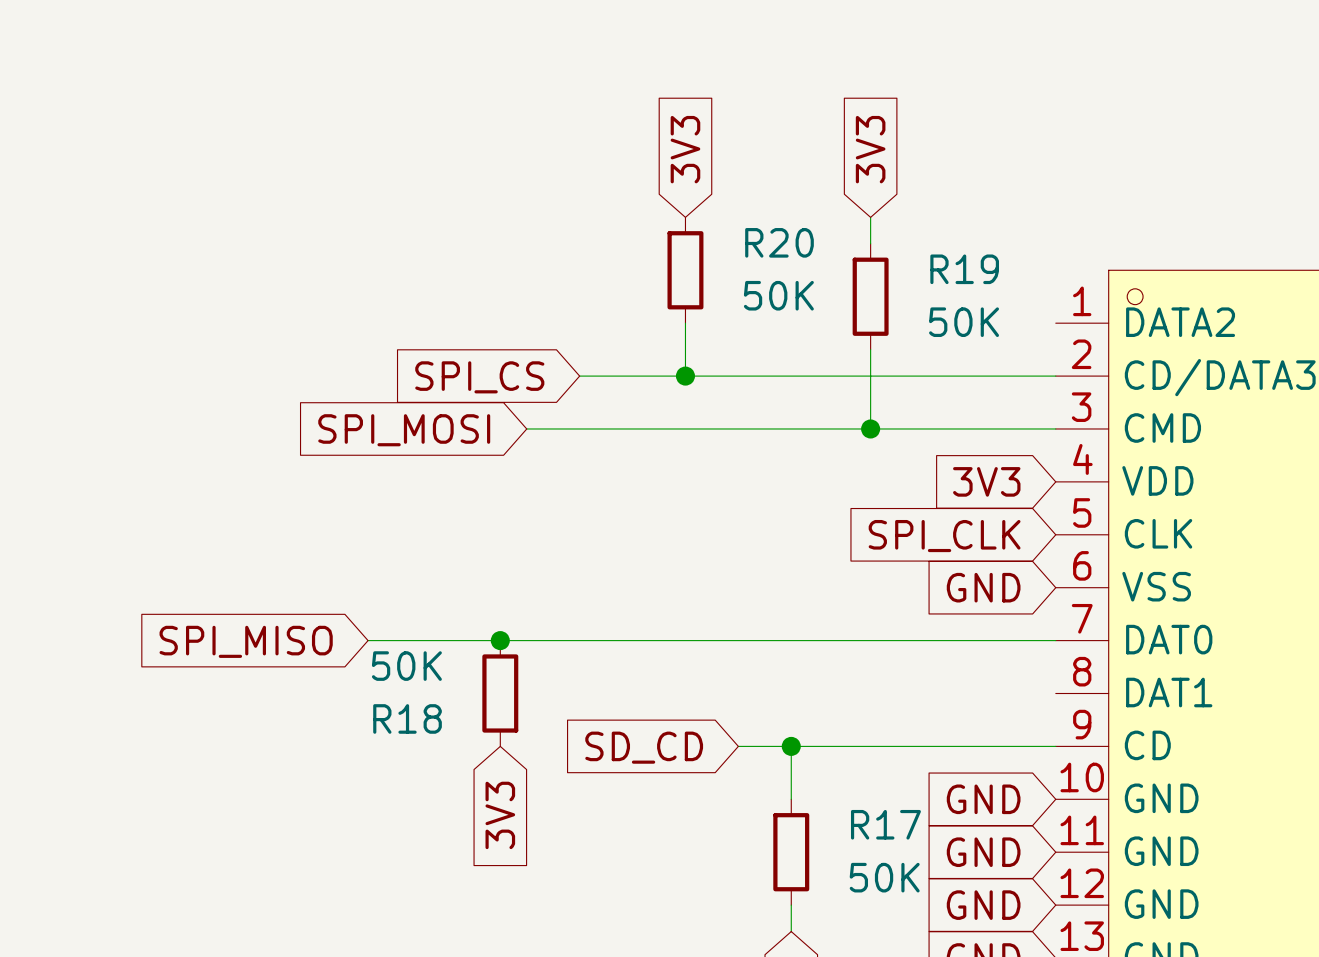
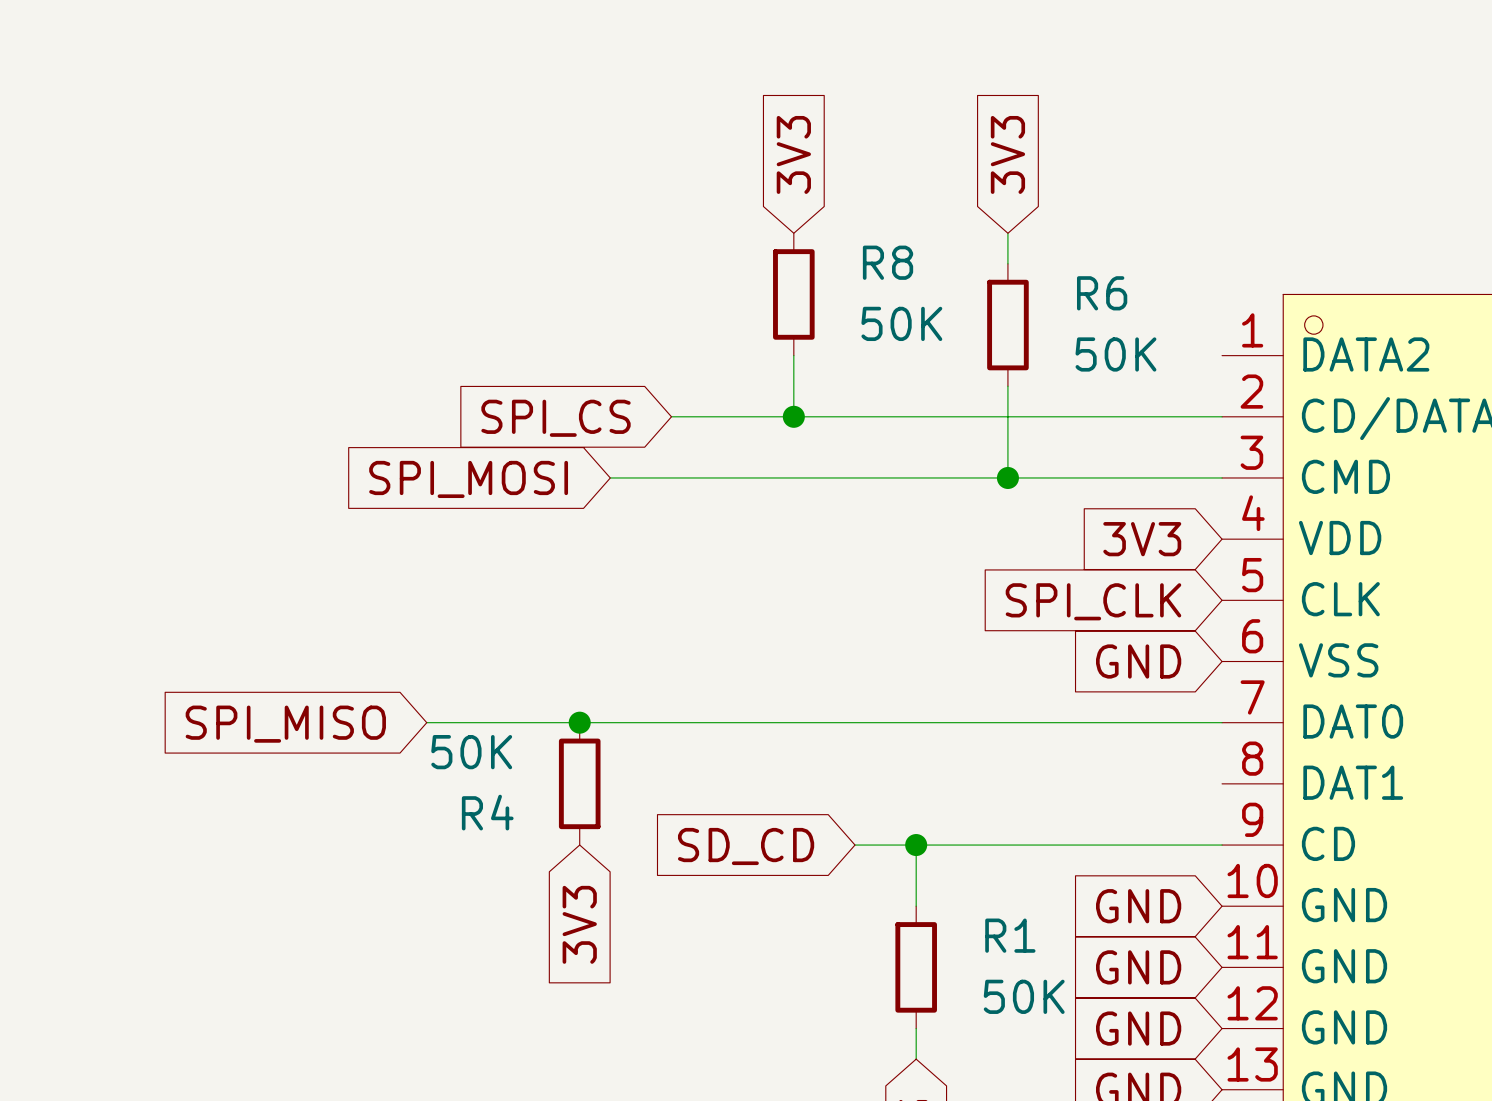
R20 name: R20 (779, 242) -> R8 (888, 262)
R19 name: R19 (964, 269) -> R6 (1102, 293)
R18 name: R18 (407, 718) -> R4 (487, 812)
R17 name: R17 (885, 824) -> R1 (1010, 935)

